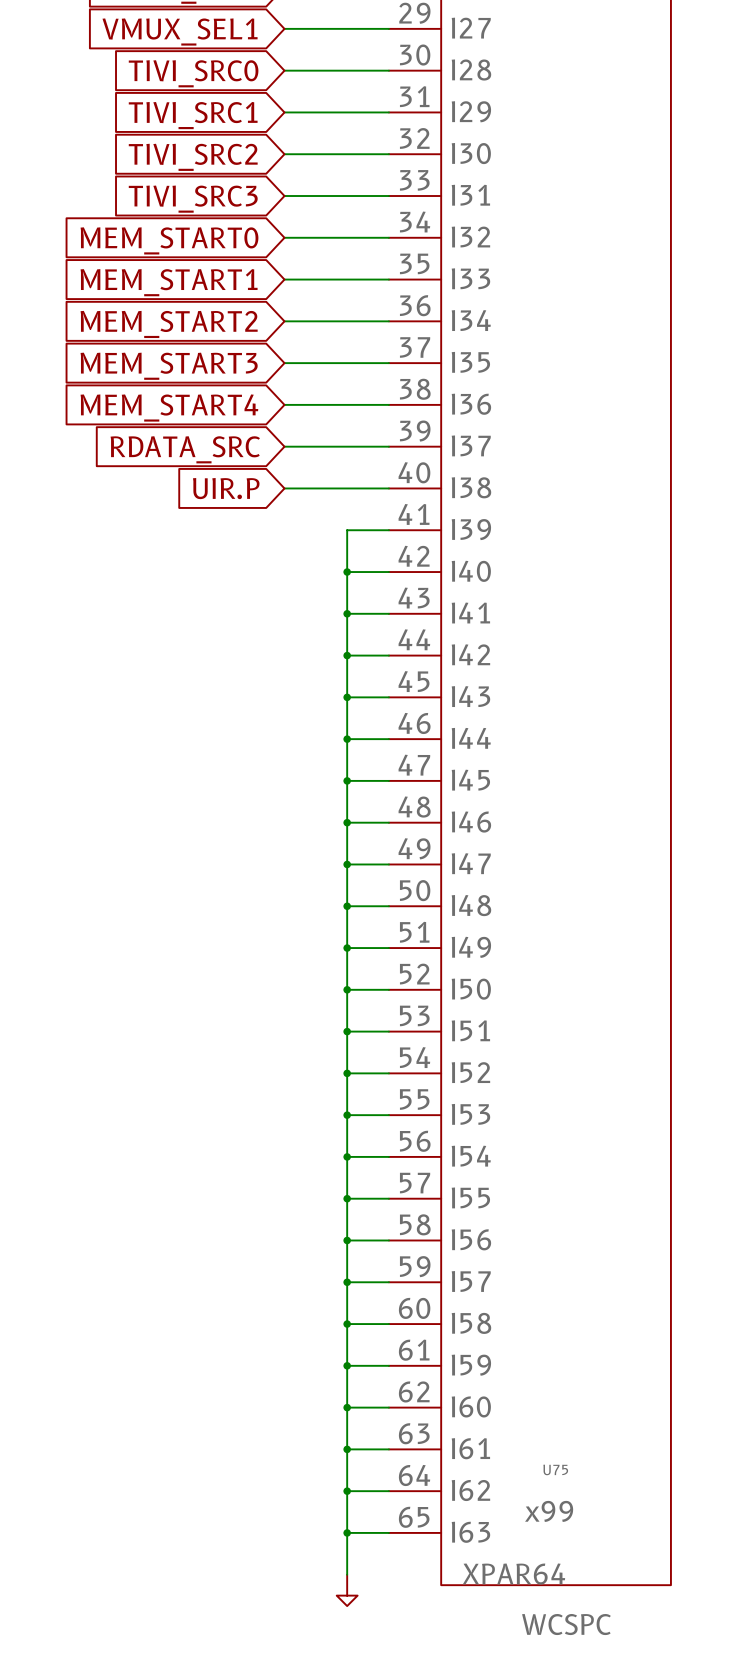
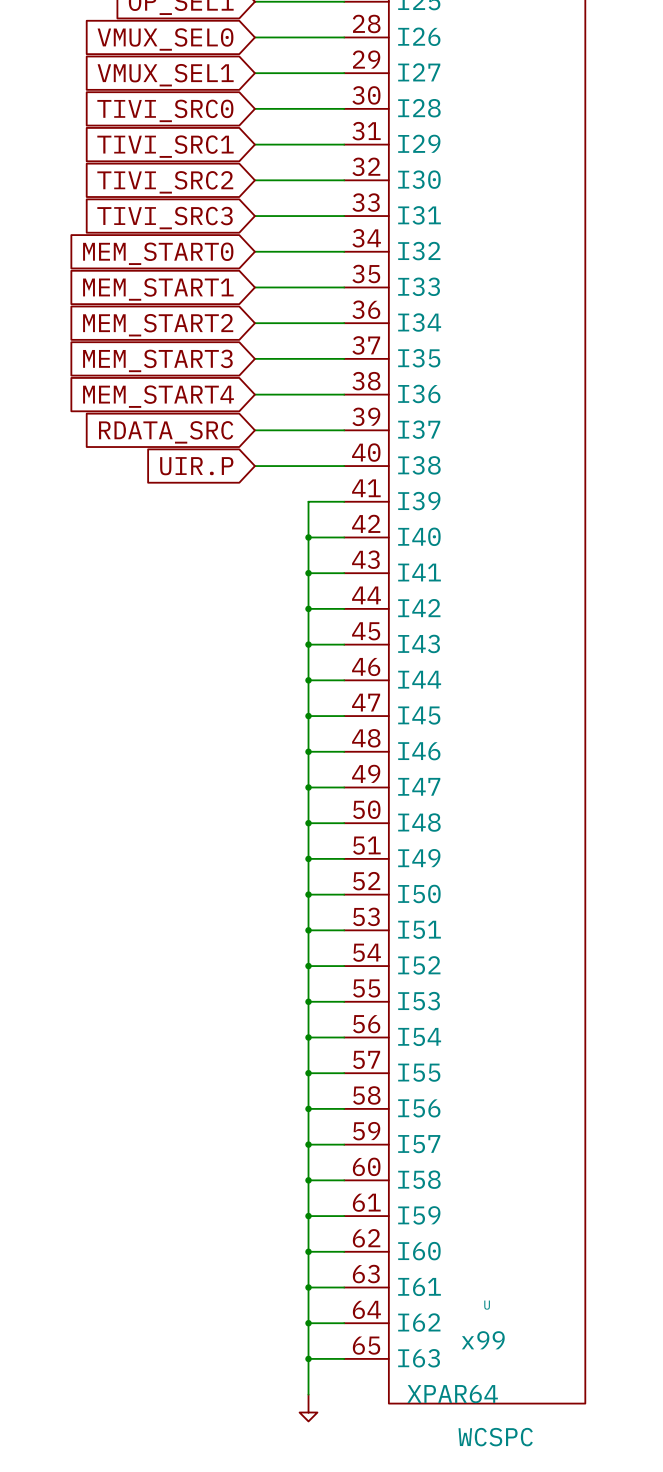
U75 name: U75 (555, 1469) -> U (487, 1305)

